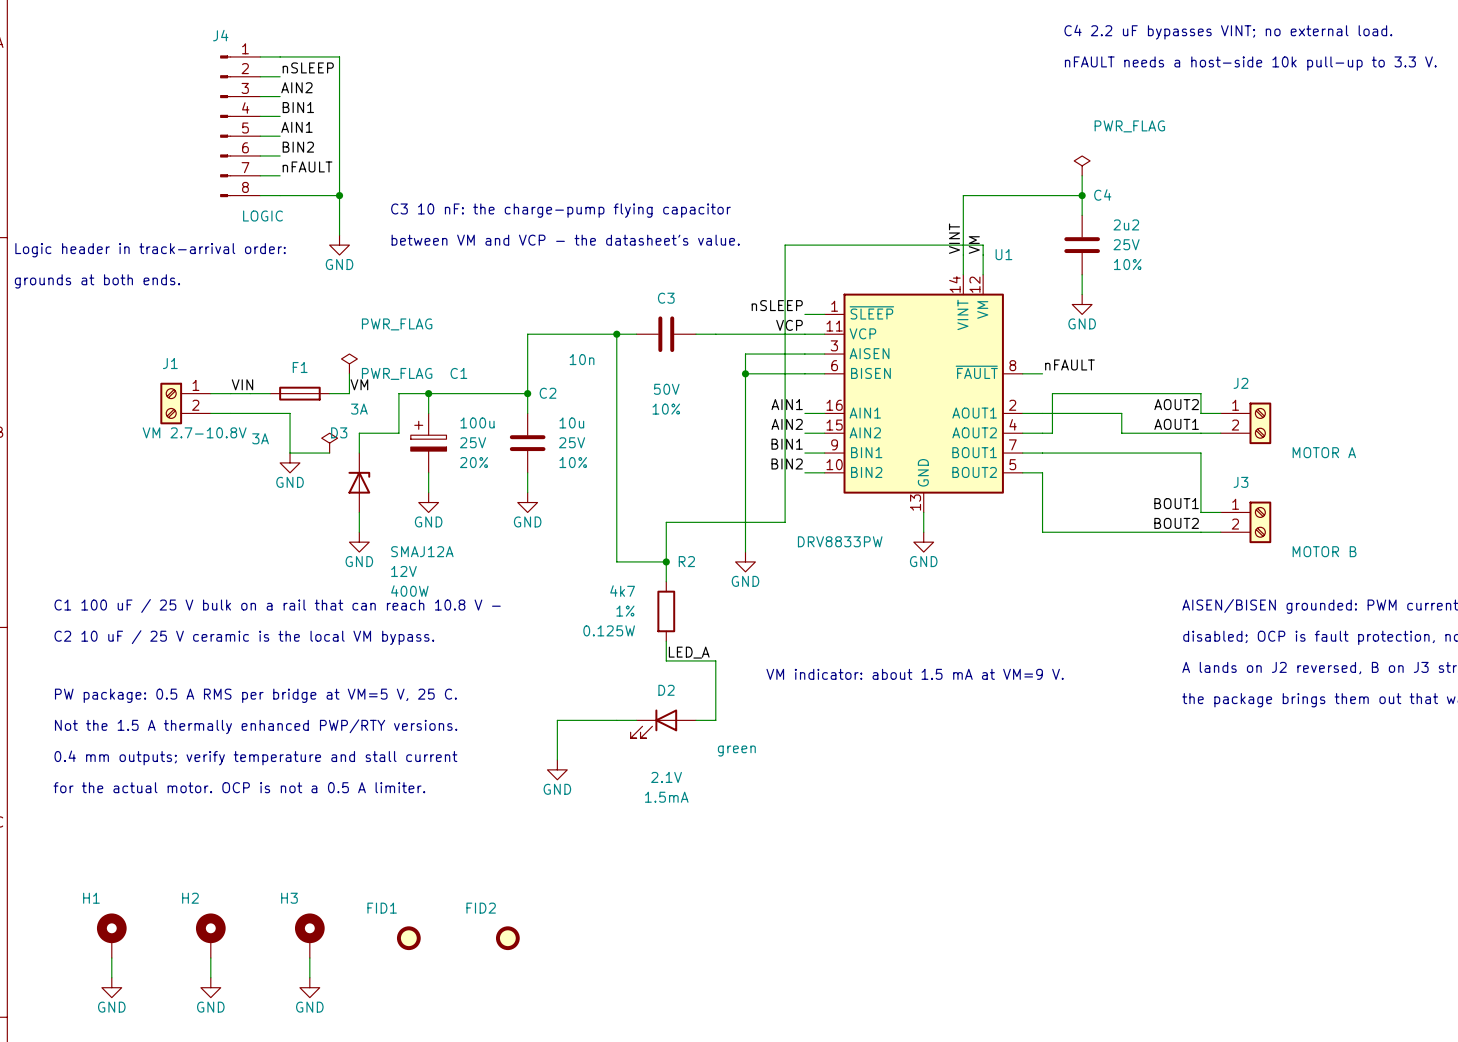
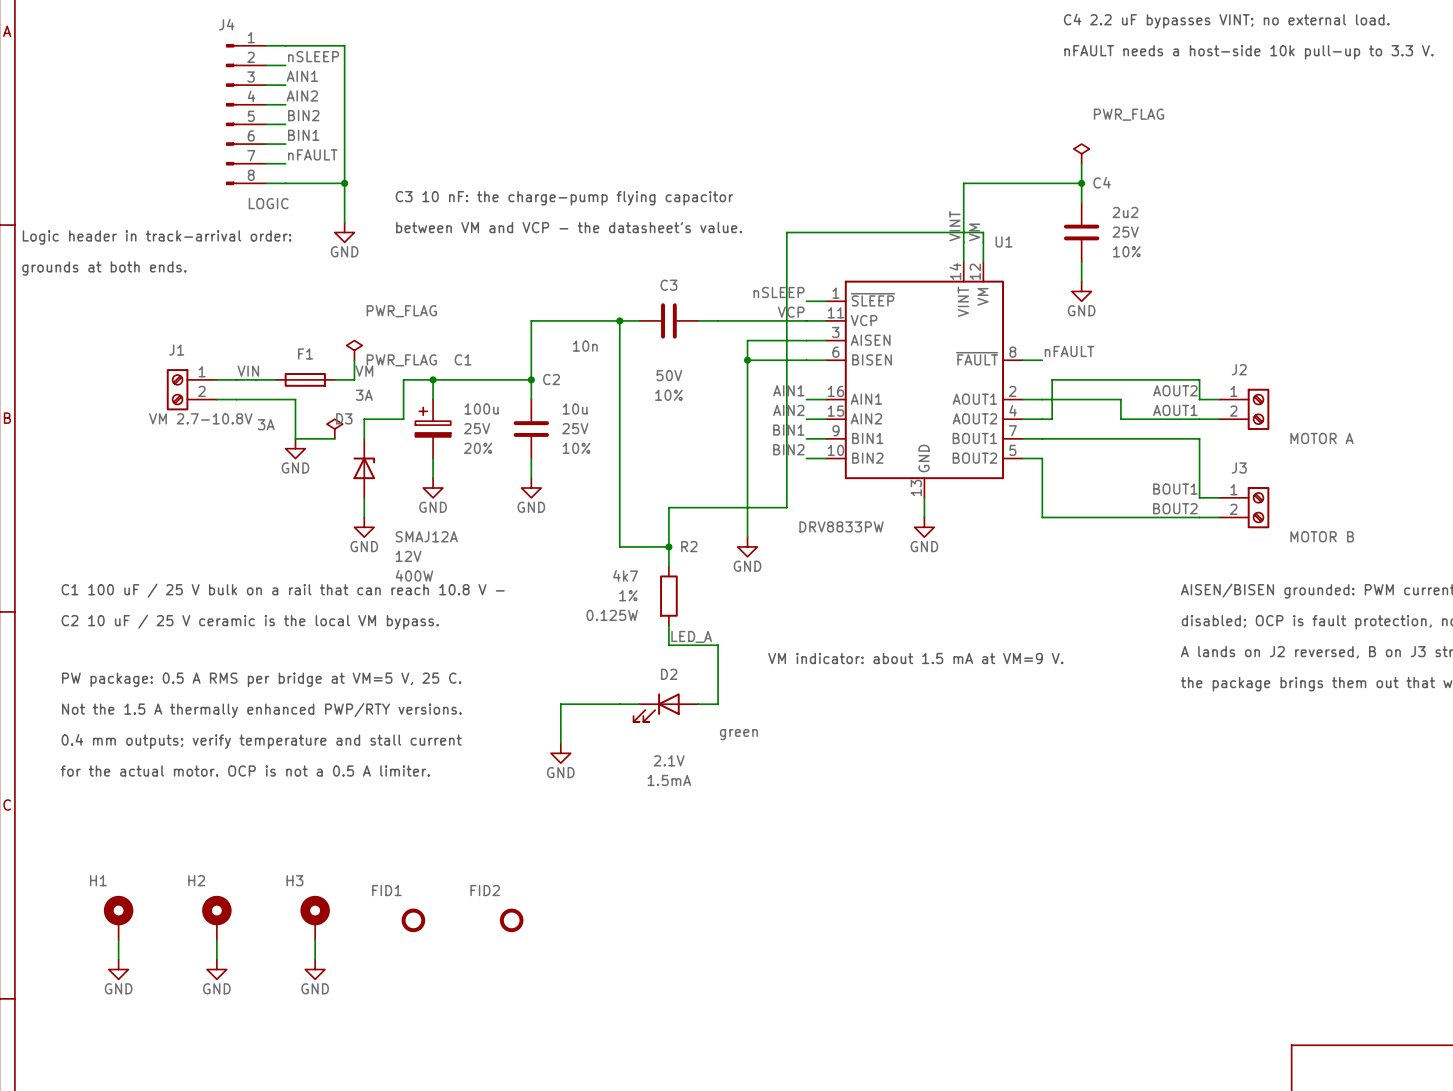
label: AIN2 (296, 87) -> AIN1 (302, 76)
label: BIN1 (298, 107) -> AIN2 (302, 95)
label: AIN1 (296, 127) -> BIN2 (303, 115)
label: BIN2 (298, 147) -> BIN1 (303, 135)

